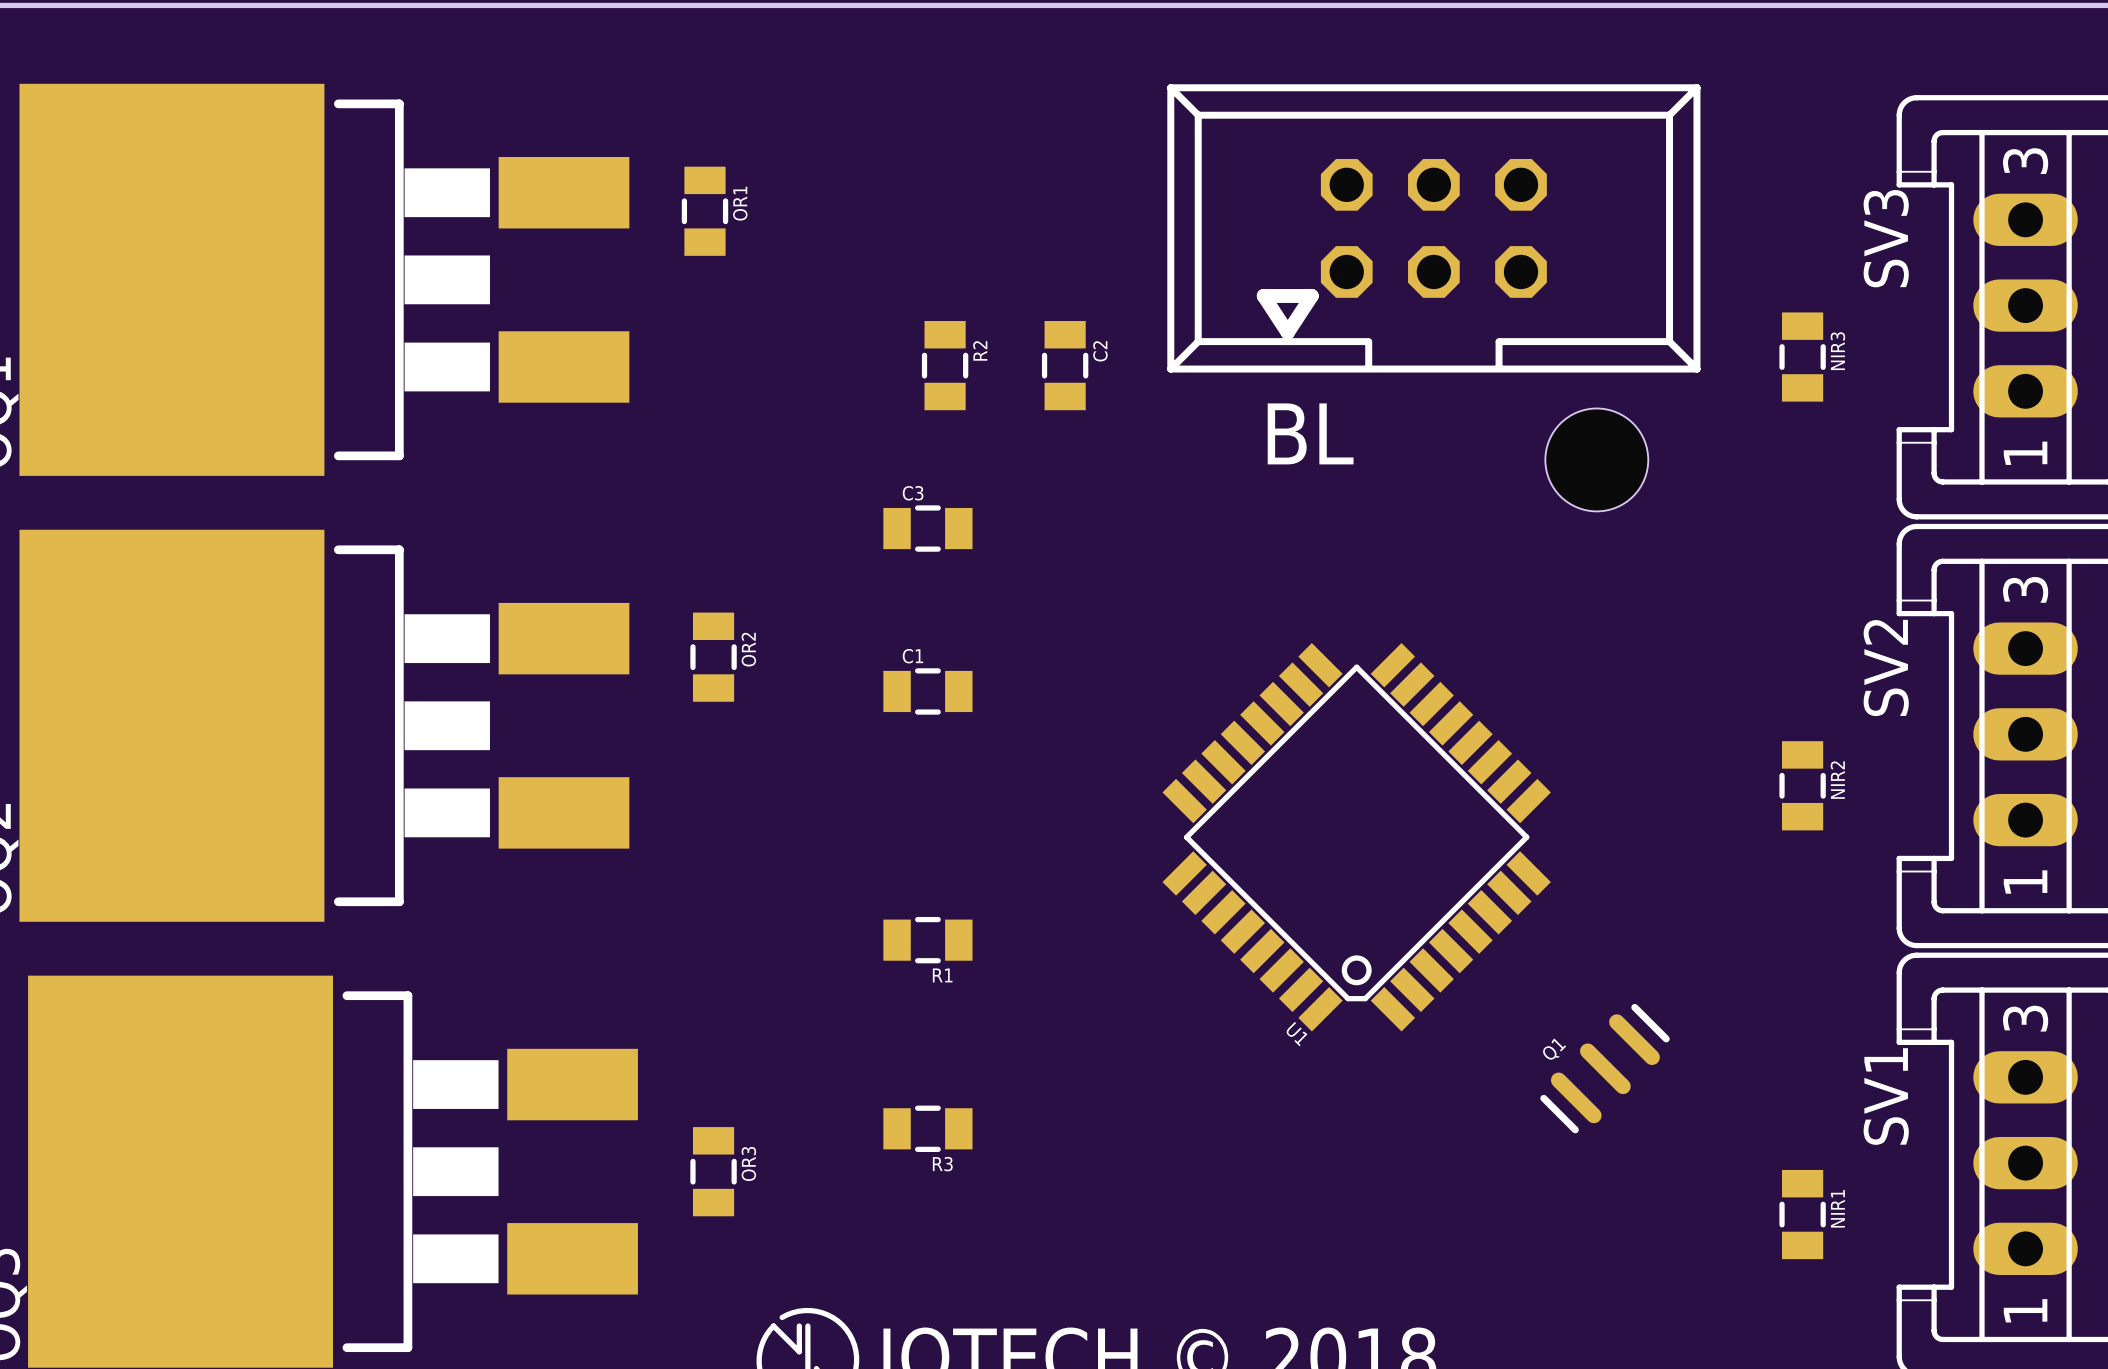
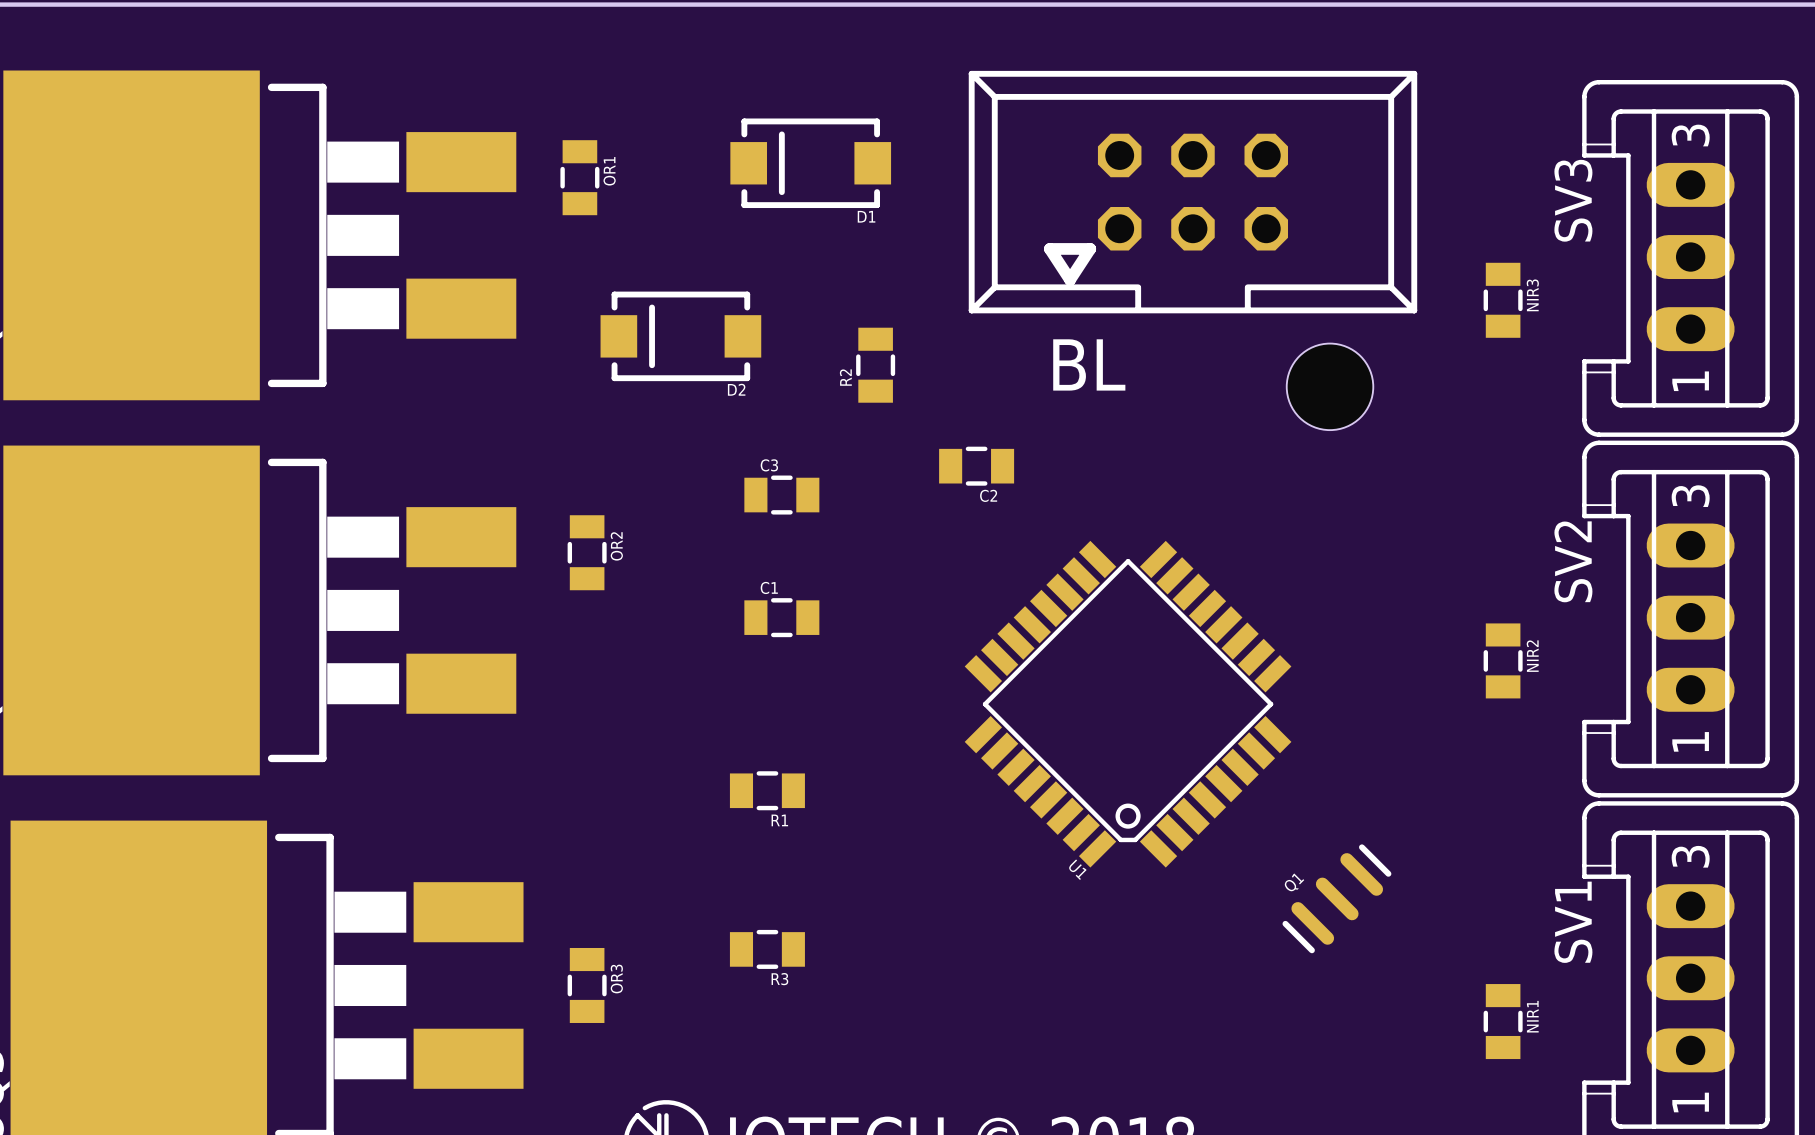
D1: none -> (810, 163)
R2 name position: R2 (980, 350) -> R2 (845, 377)
R2 position: (945, 365) -> (875, 365)
C2 rotation: 0° (1065, 365) -> 90° clockwise (976, 466)
C2 position: (1065, 365) -> (976, 466)
D2: none -> (680, 336)
C3 position: (927, 528) -> (781, 495)
C1 position: (927, 691) -> (781, 617)

